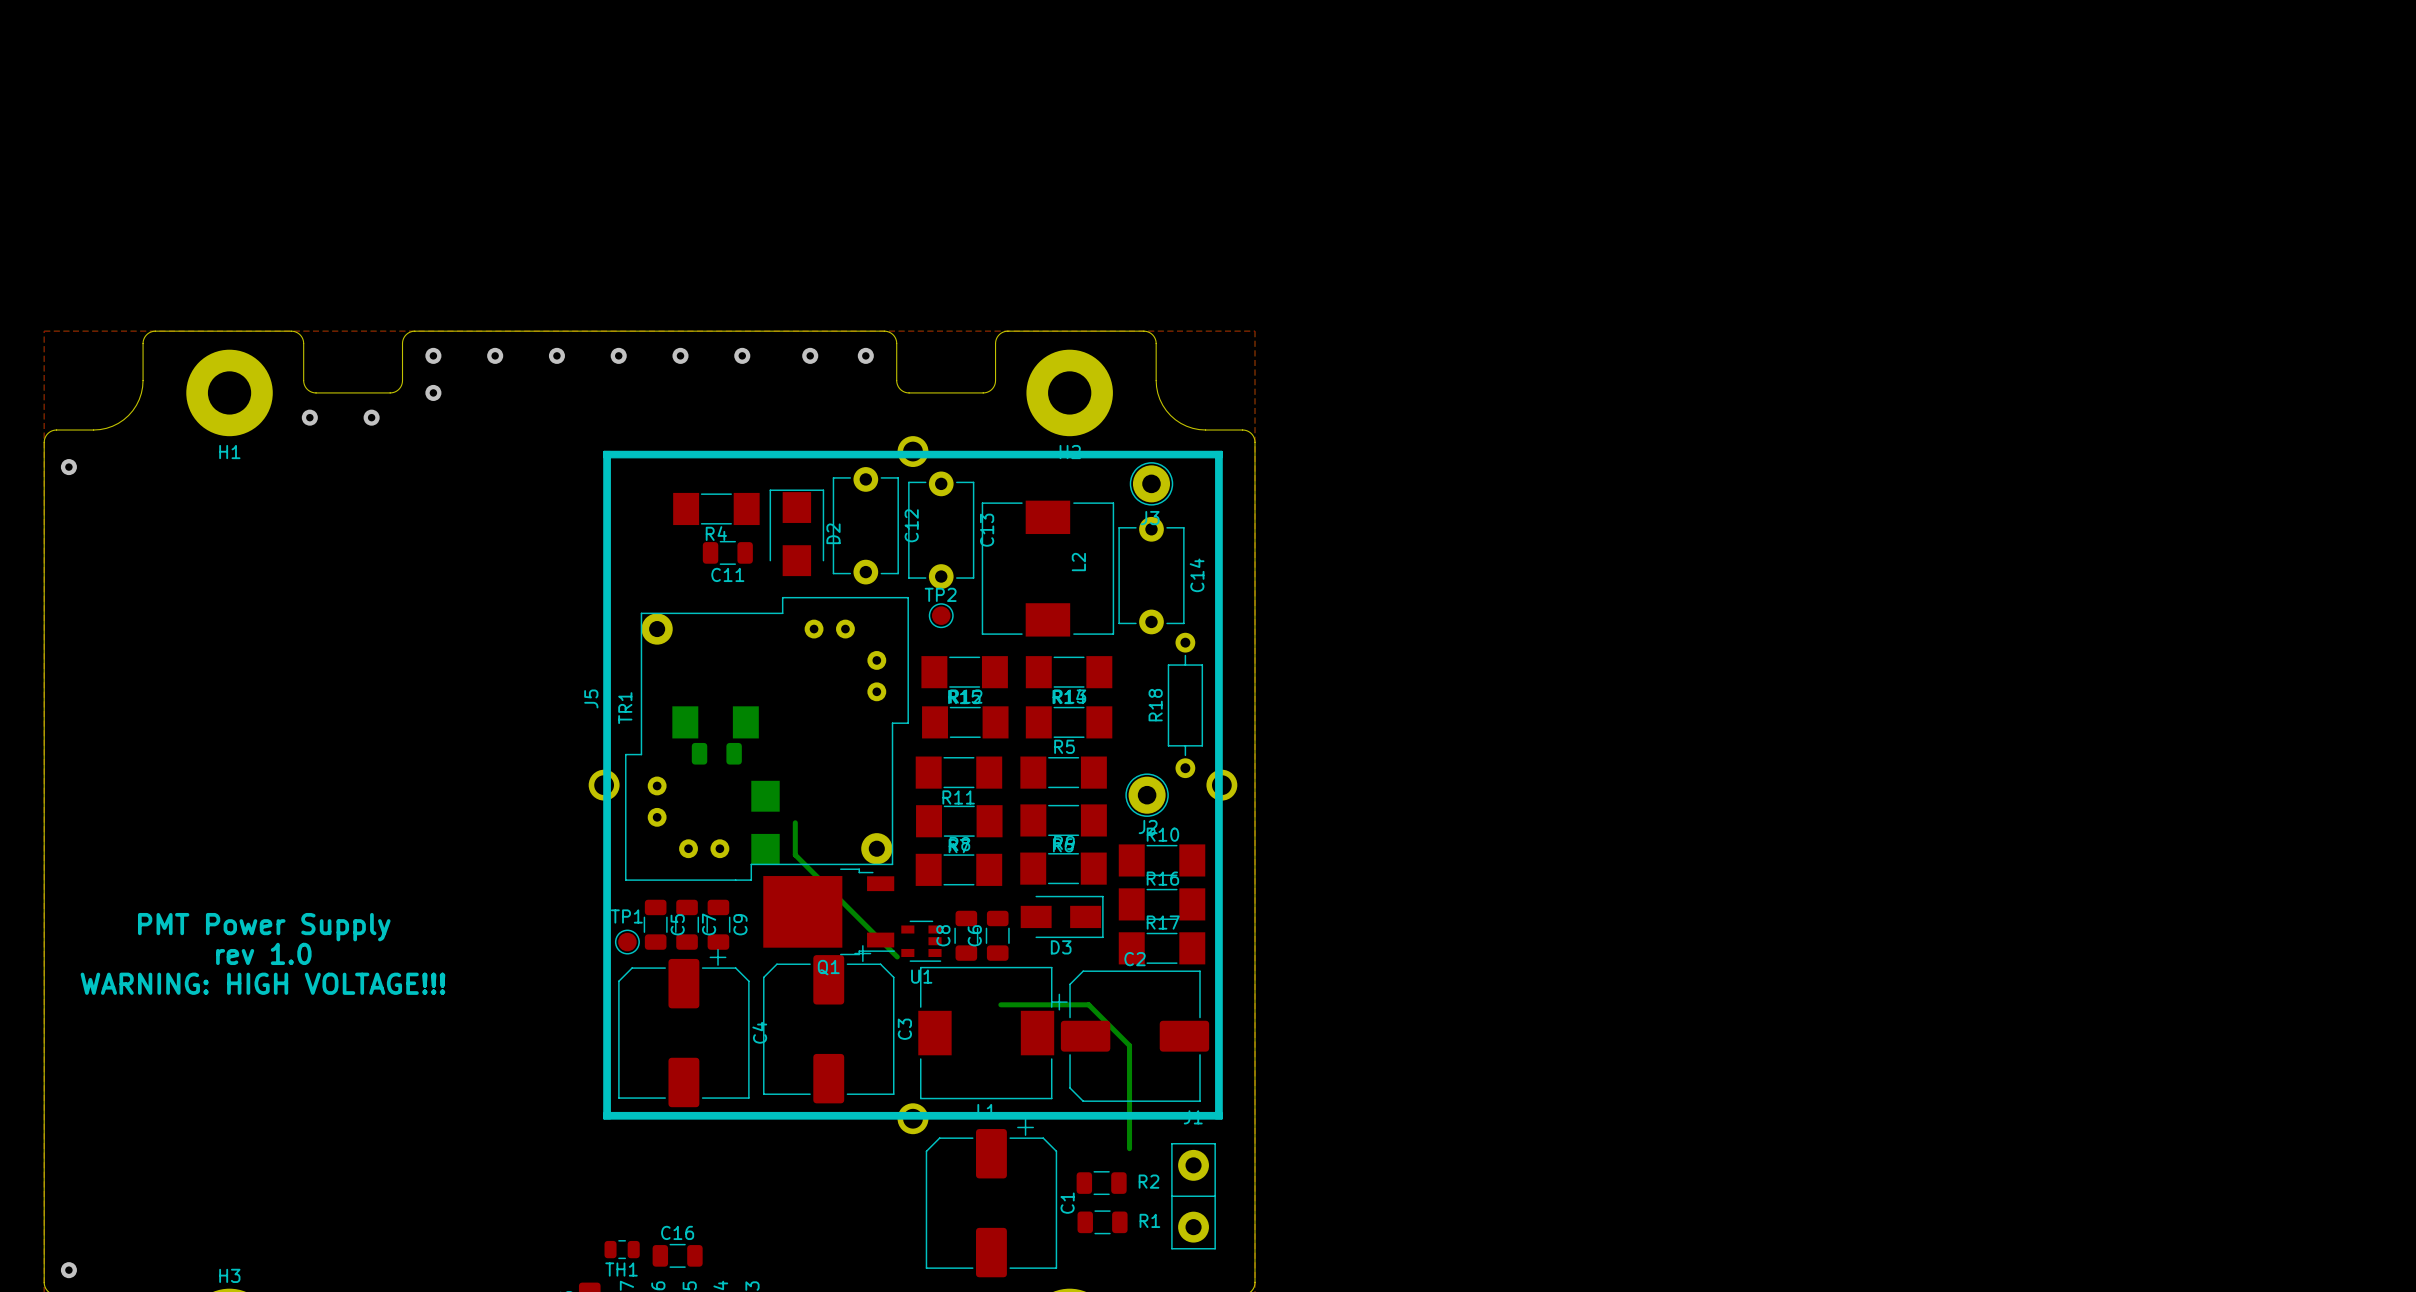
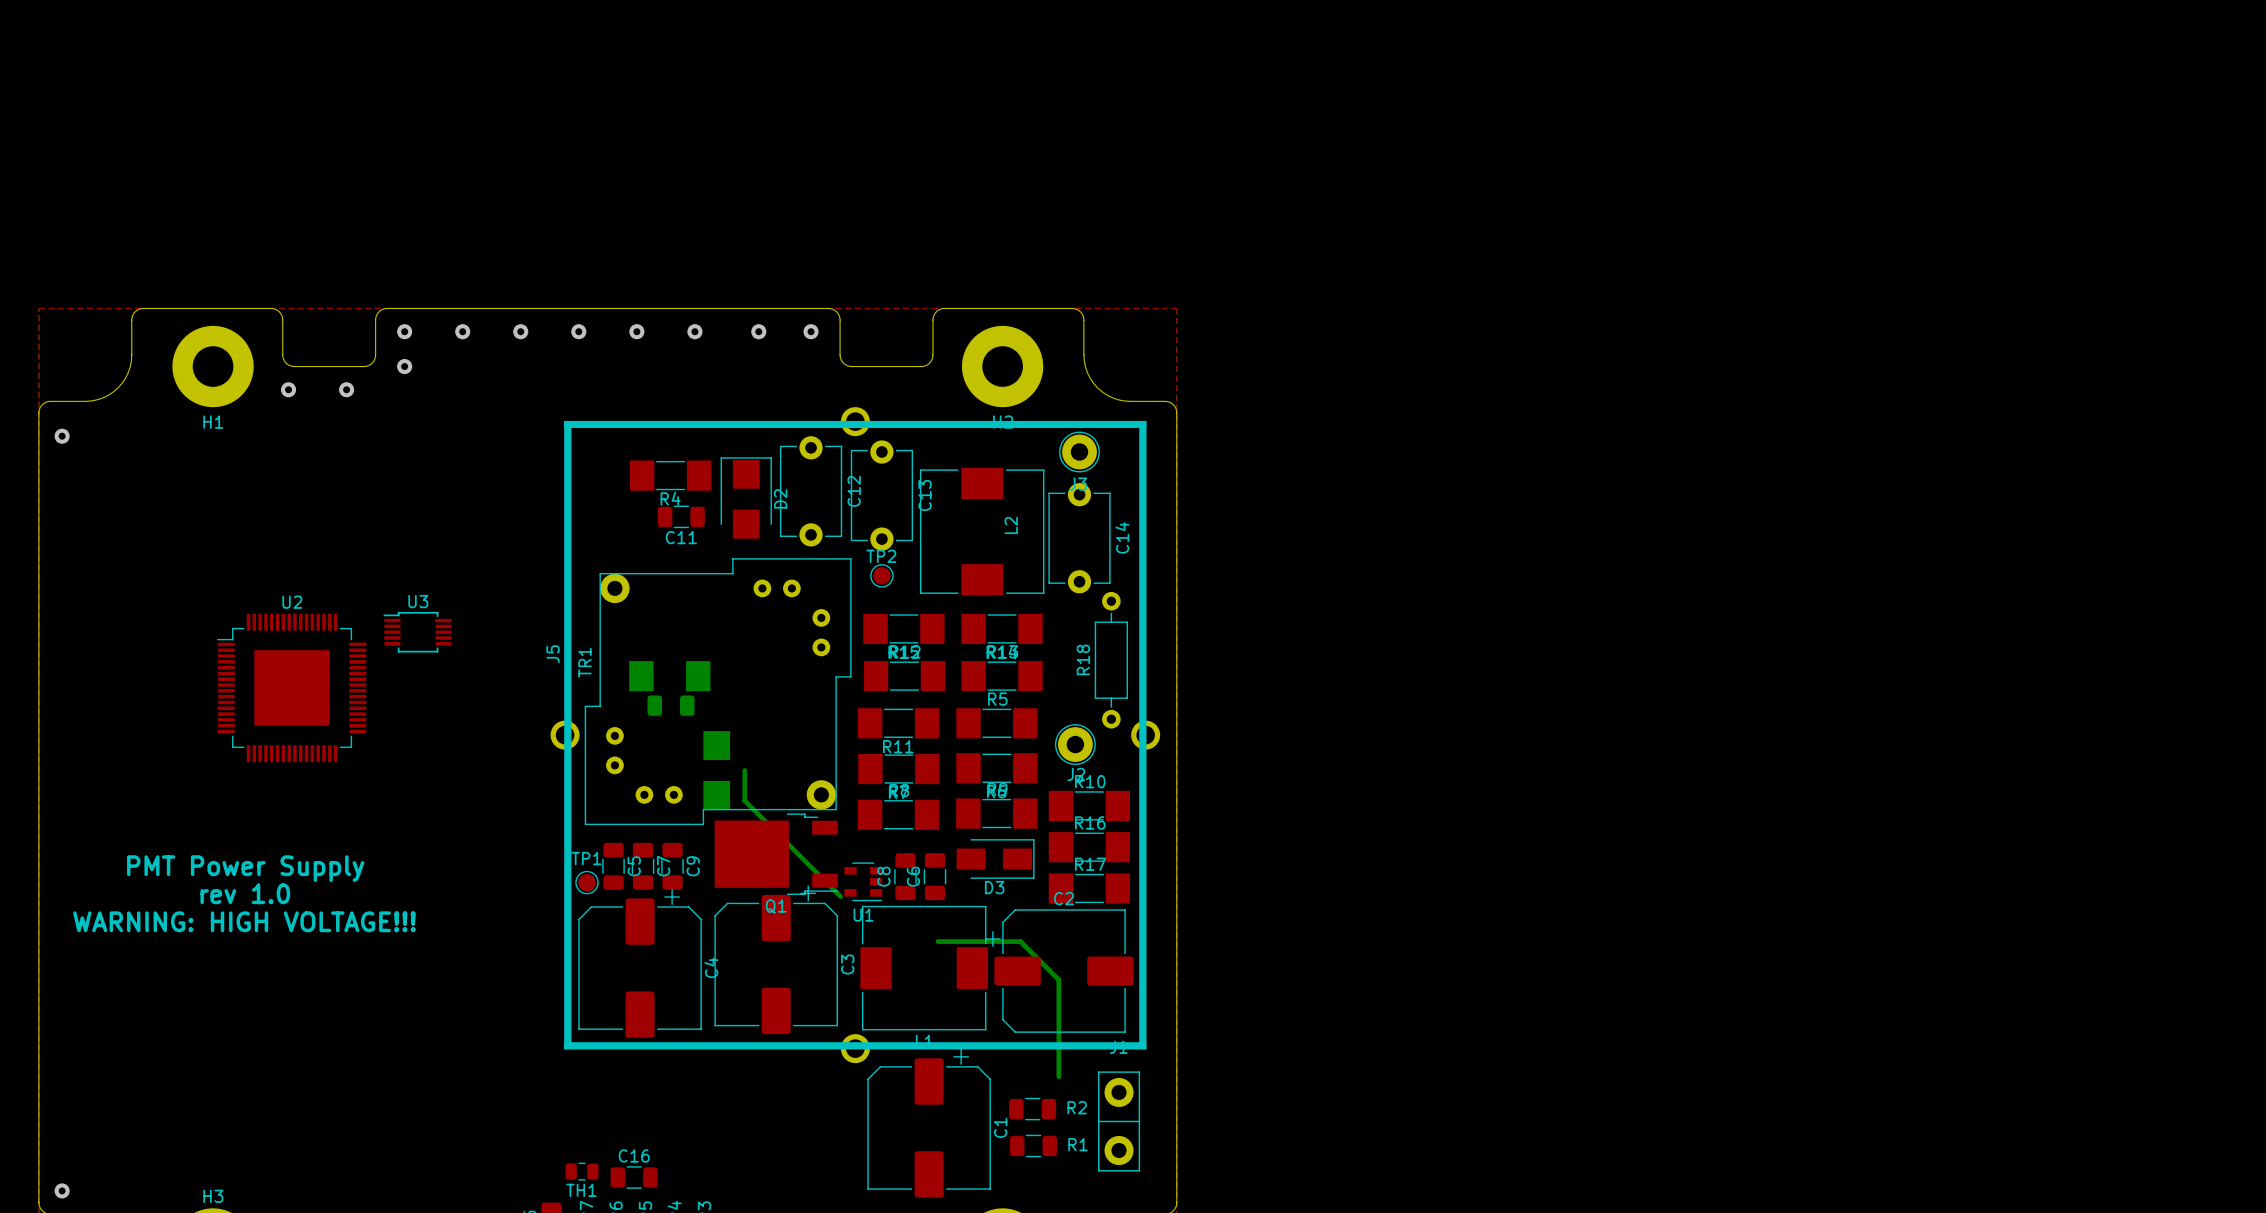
U3: none -> (417, 632)
U2: none -> (291, 687)

